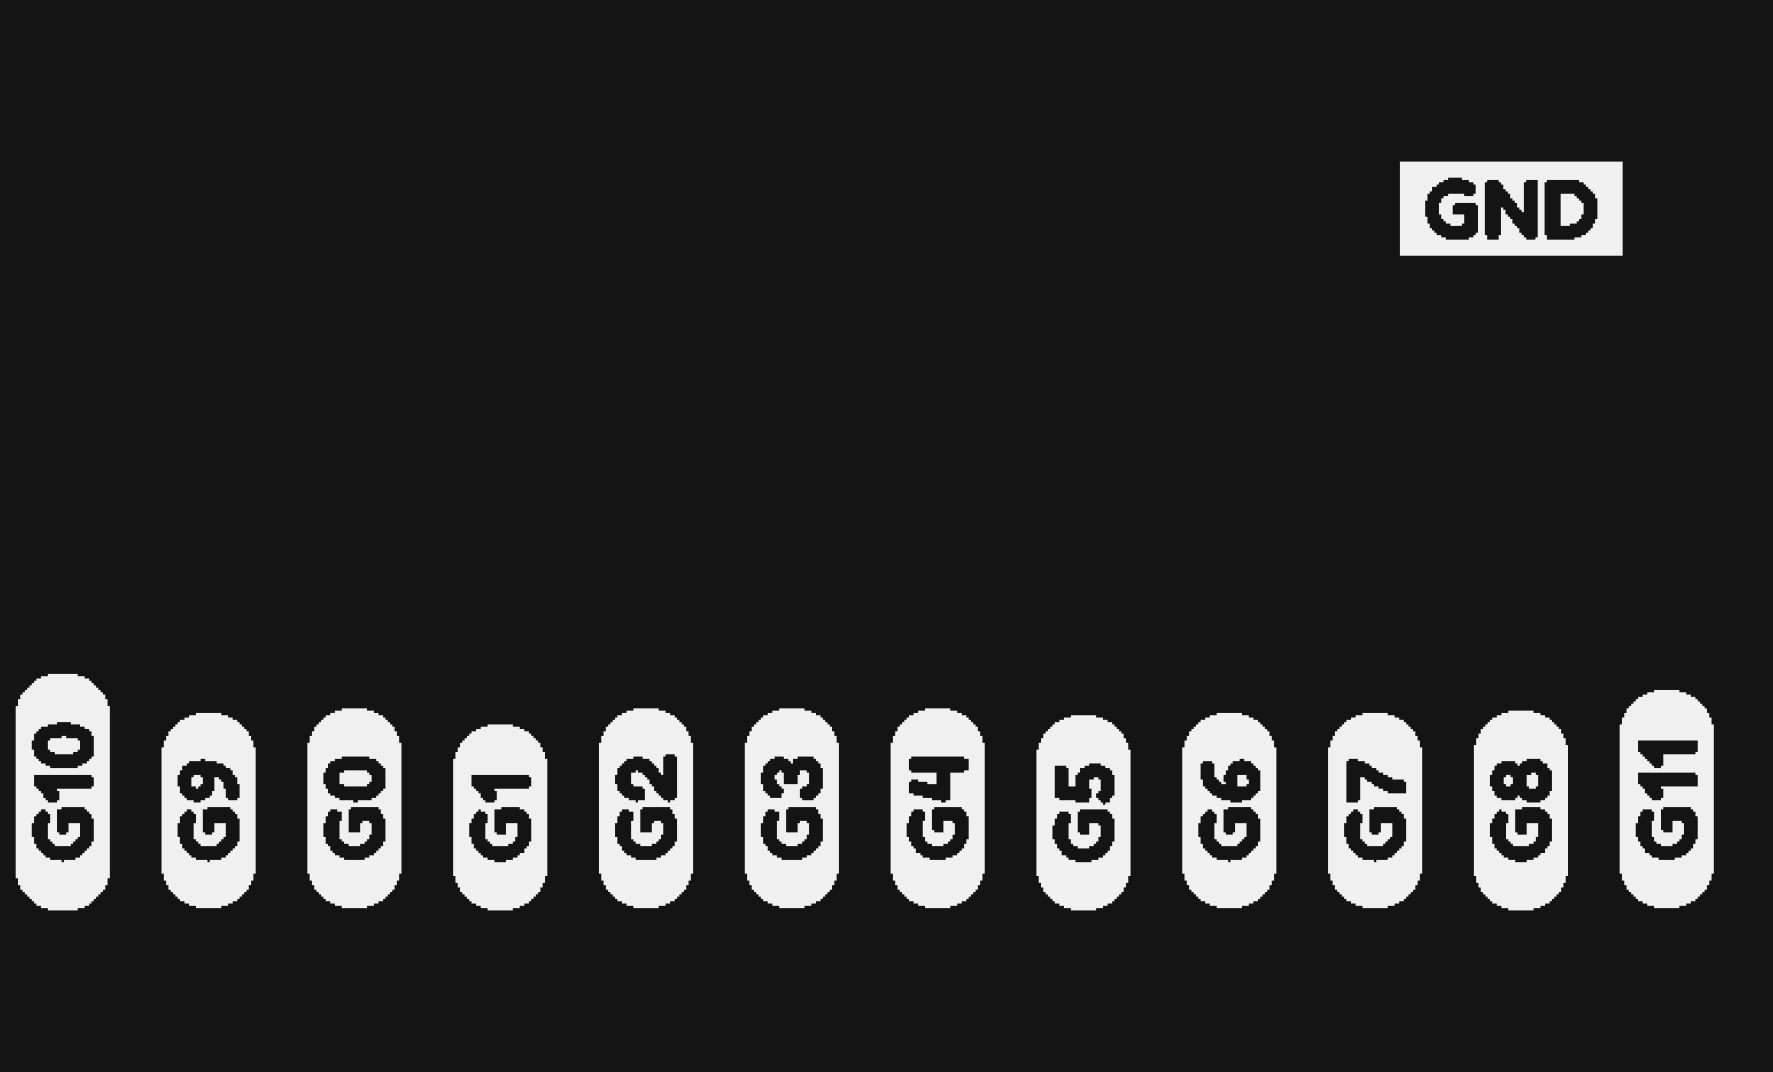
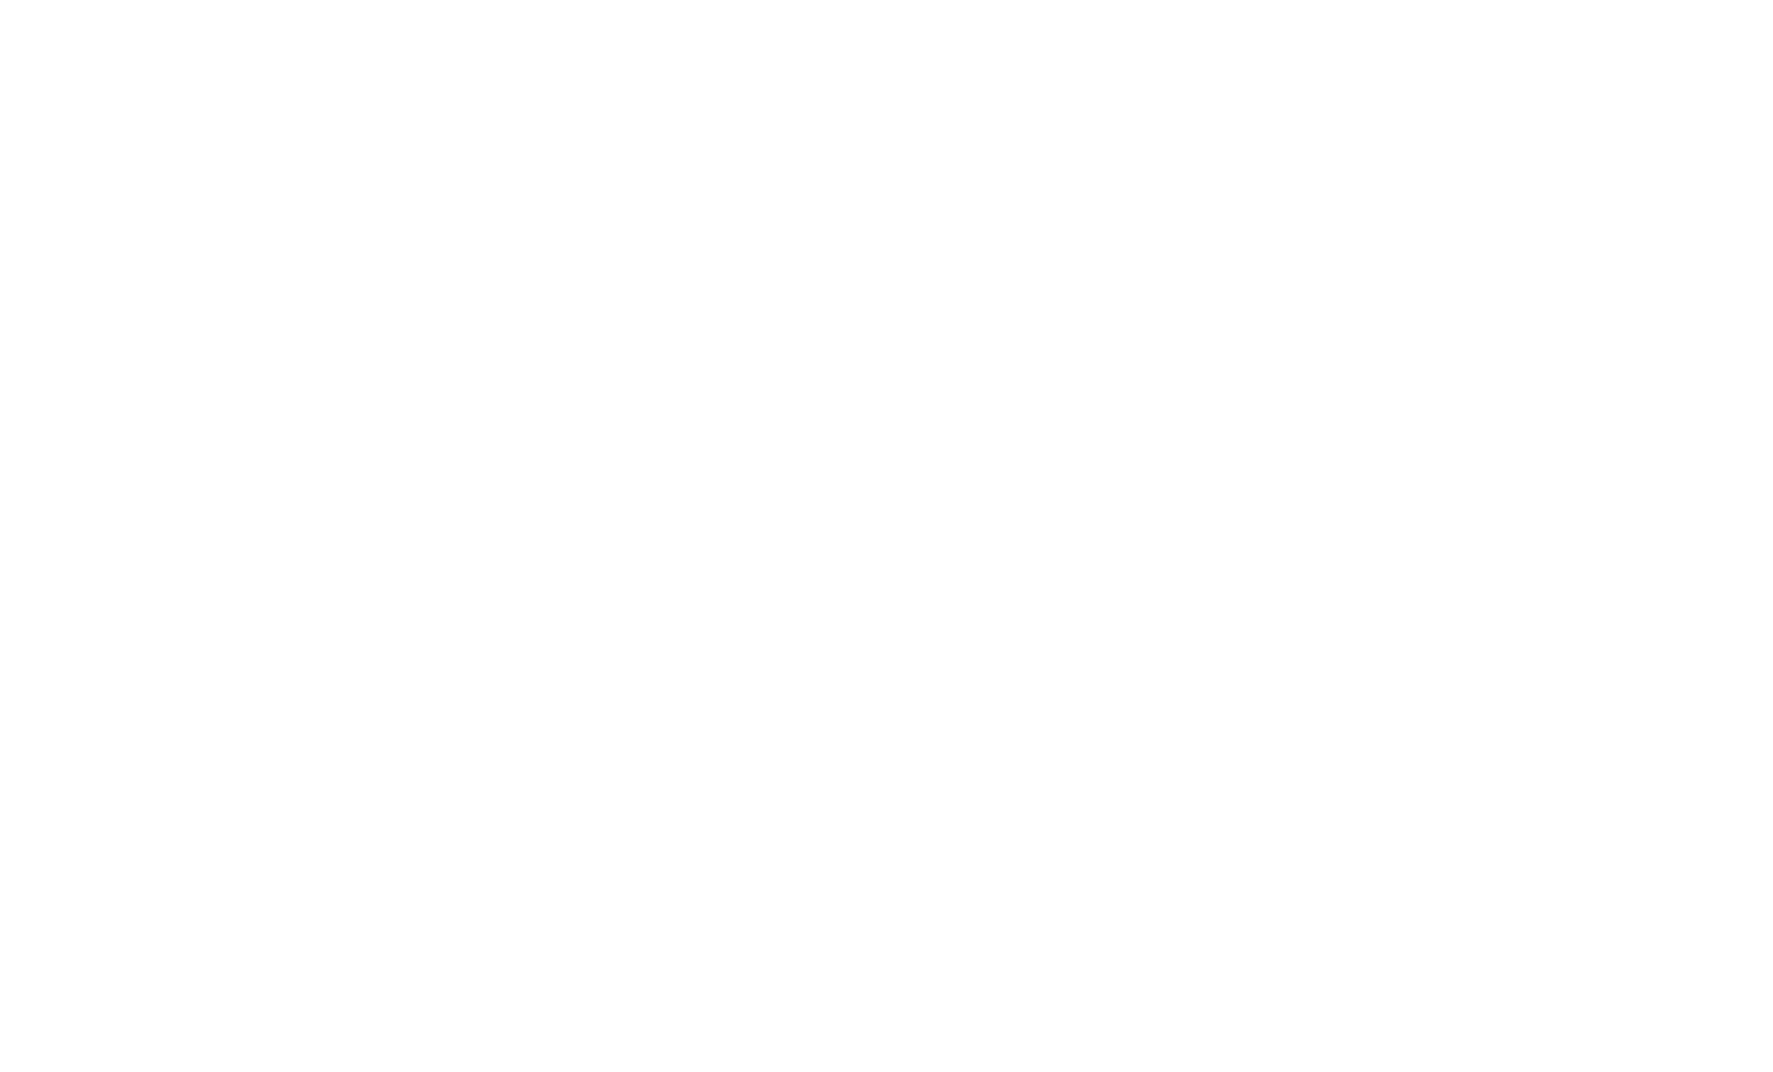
drawing: [1399, 161, 1623, 256] -> none
drawing: [15, 673, 1714, 911] -> none

